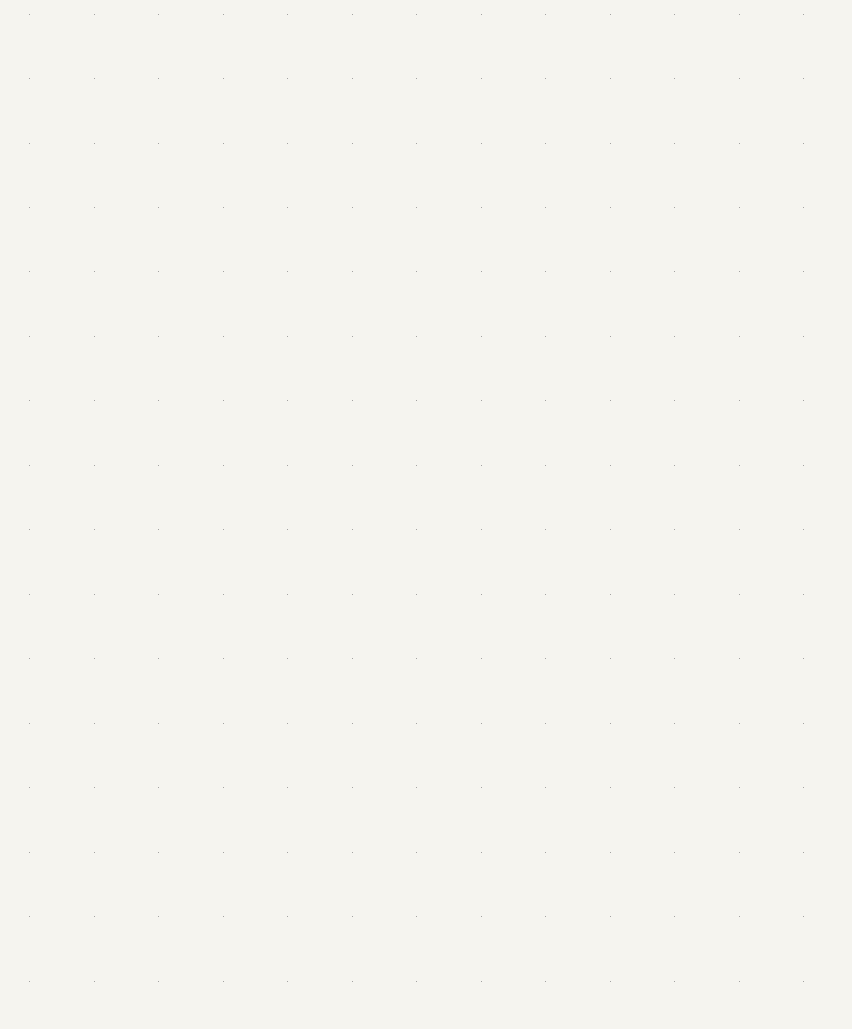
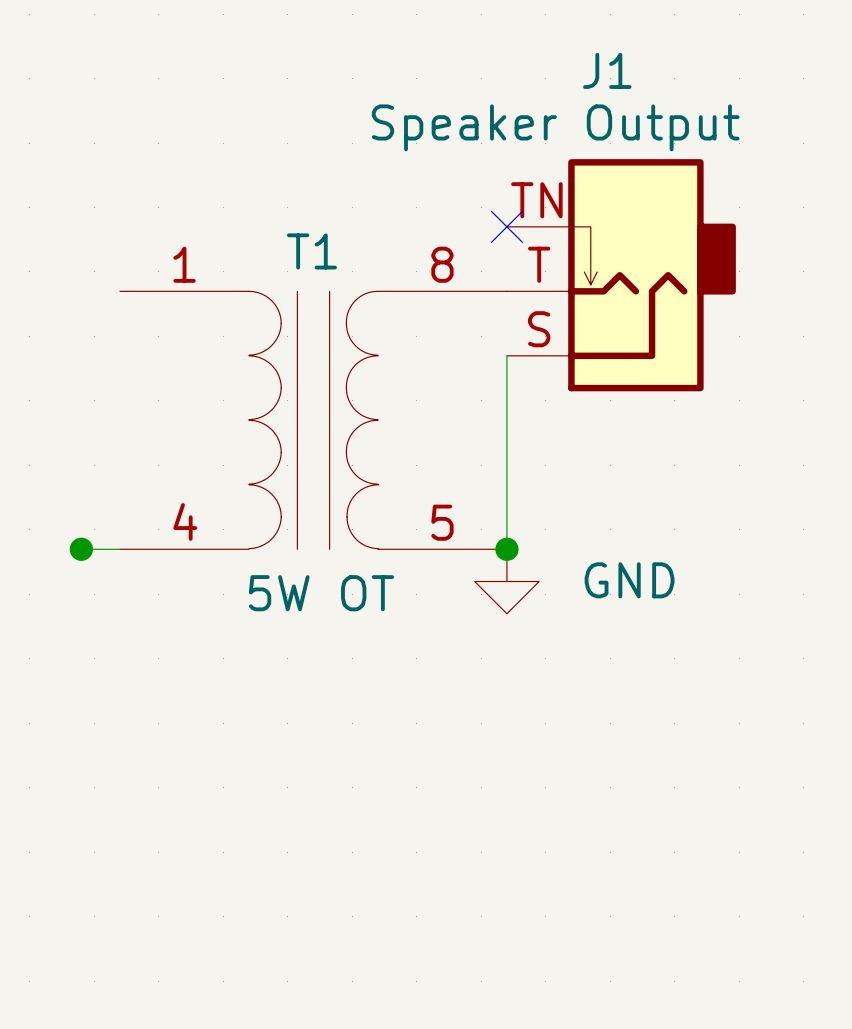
no-connect mark: none -> (506, 226)
J1: none -> Speaker Output (621, 275)
wire: none -> (506, 355) (506, 549)
T1: none -> 5W OT (313, 420)
wire: none -> (81, 549) (120, 549)
junction: none -> (81, 549)
junction: none -> (506, 549)
power symbol: none -> GND (506, 581)

